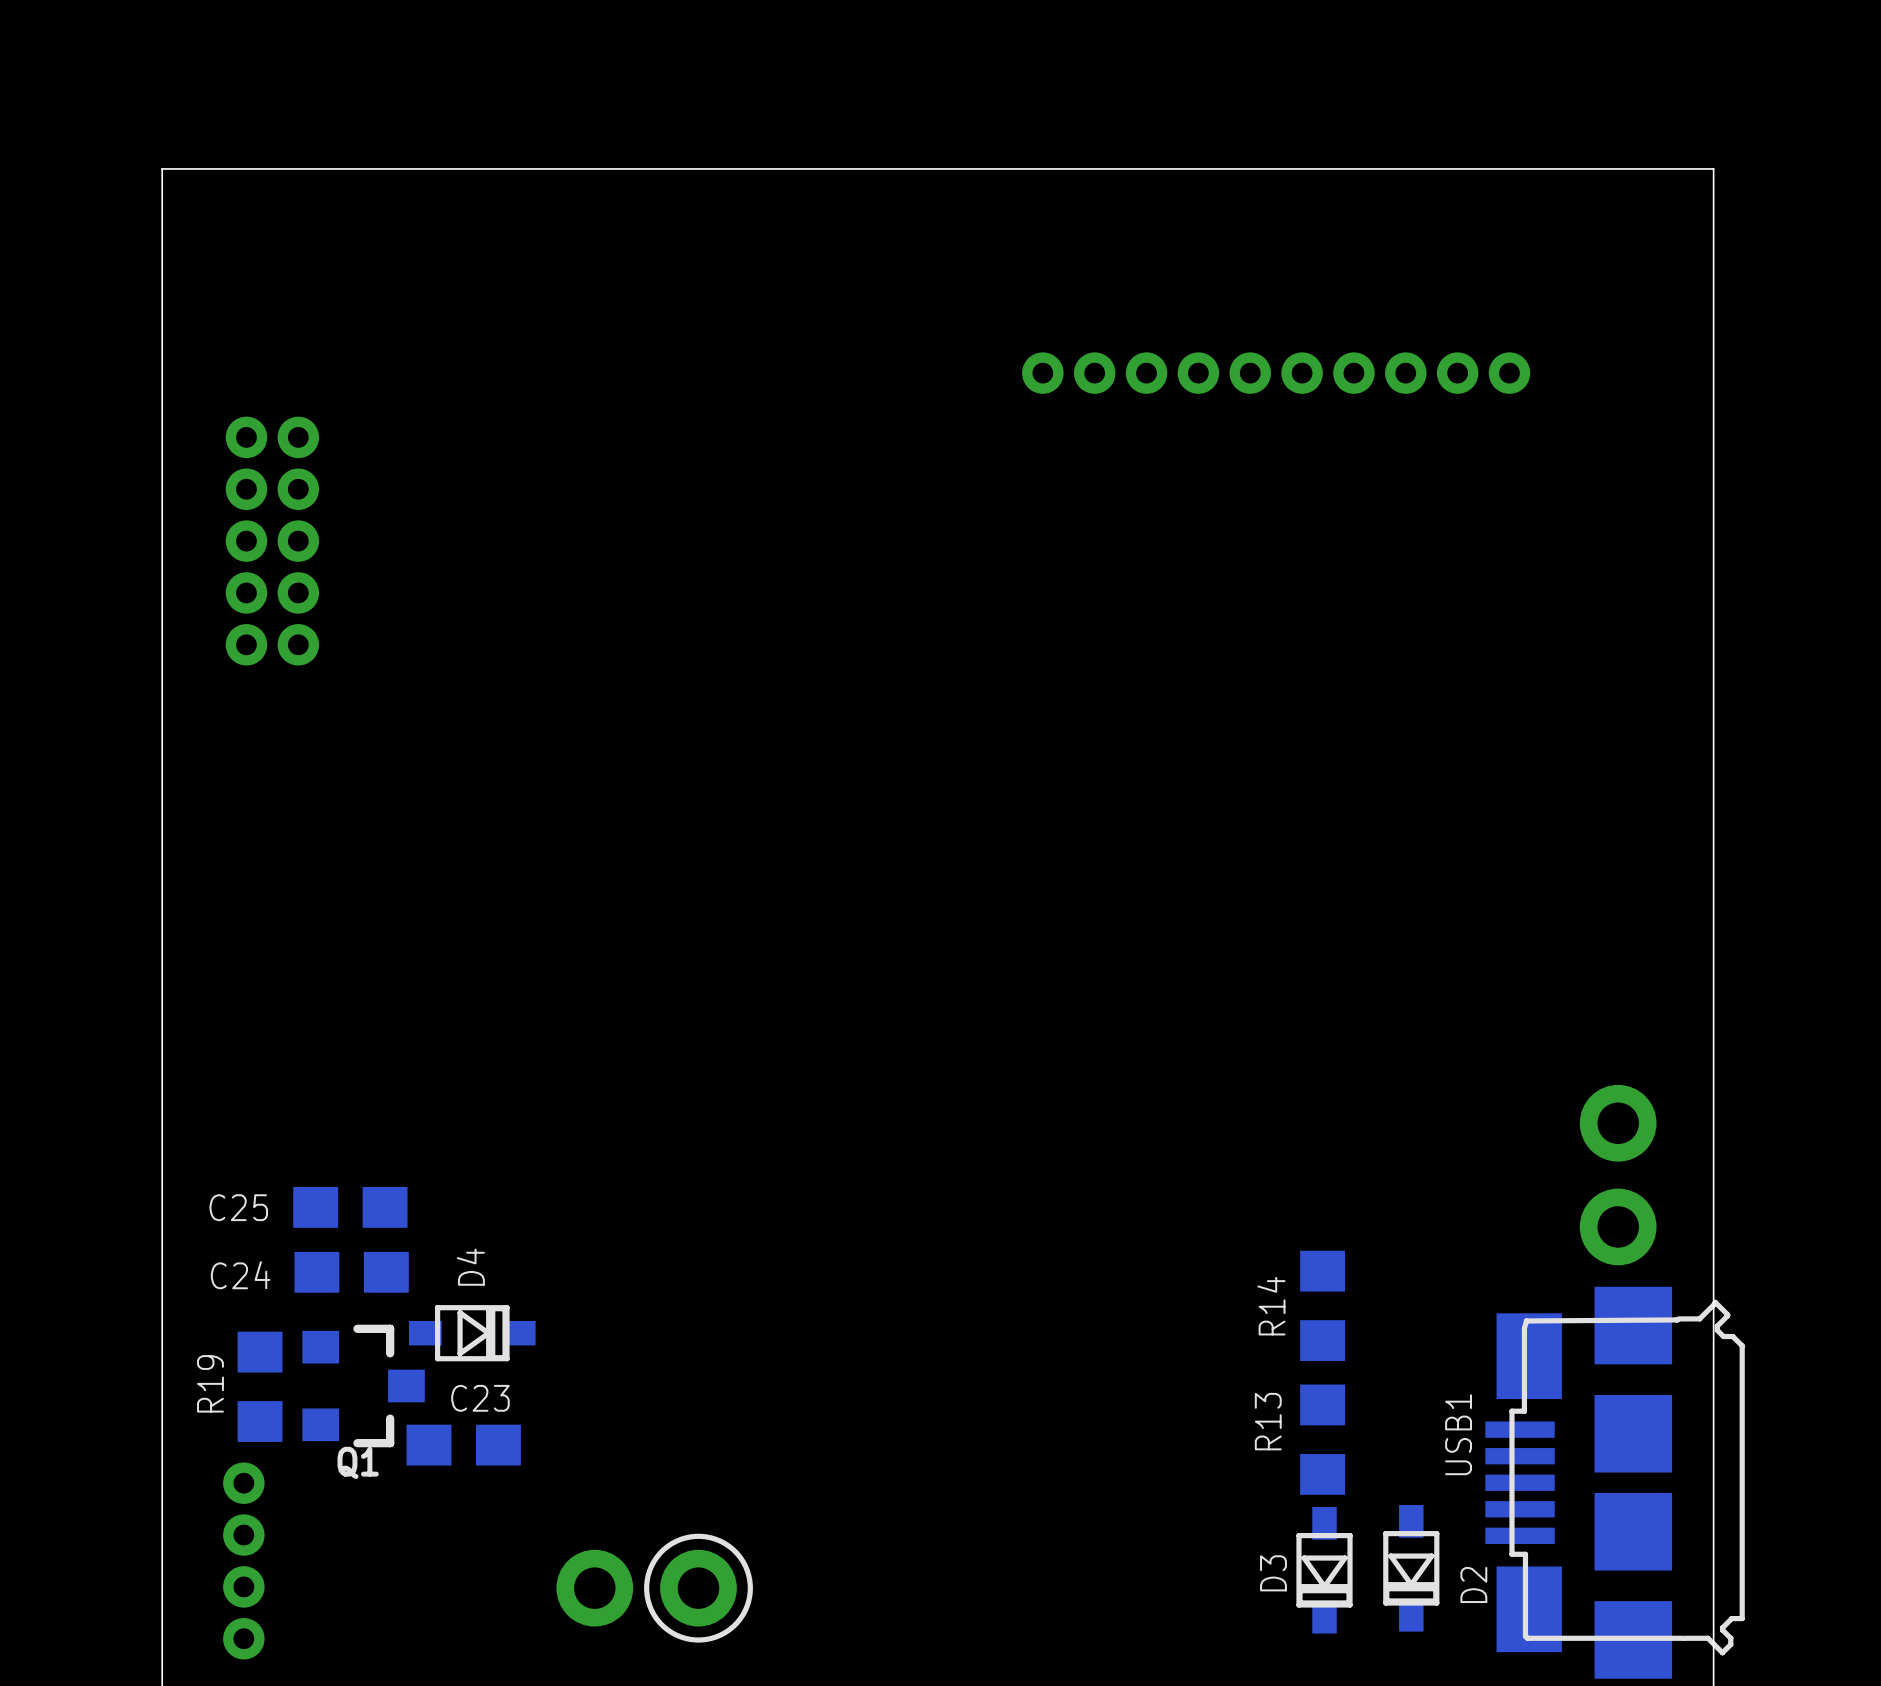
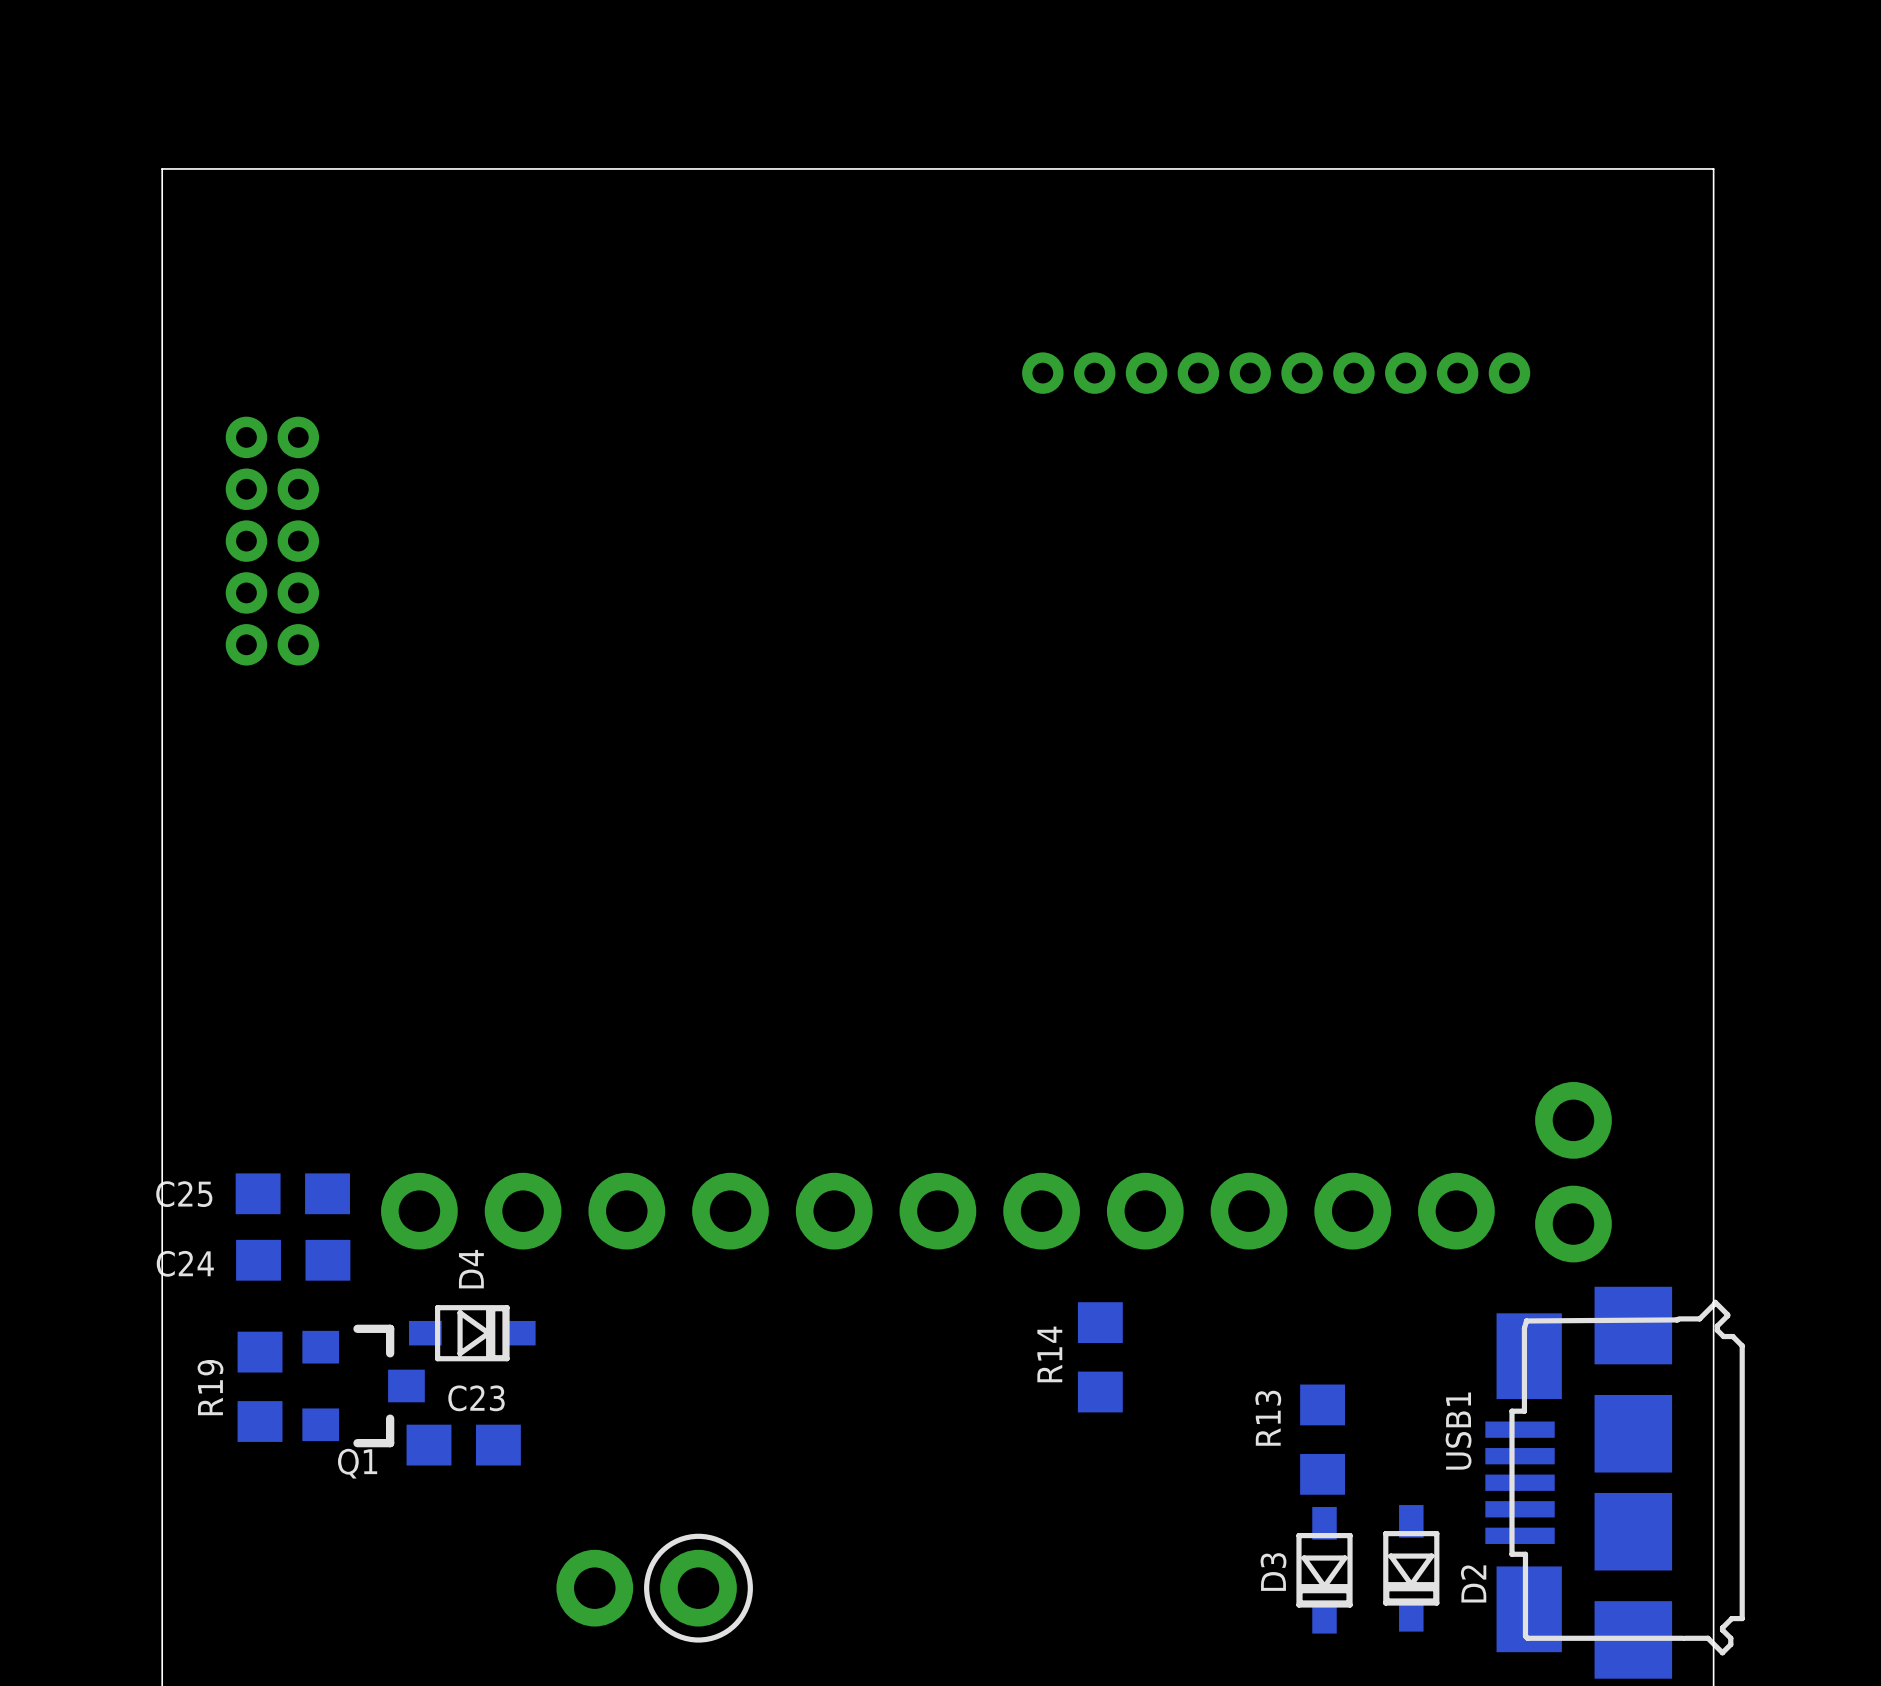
part position: (1618, 1175) -> (1573, 1172)
C25 position: (350, 1207) -> (292, 1193)
part: none -> (419, 1211)
part: none -> (989, 1211)
C24 position: (351, 1272) -> (293, 1260)
R14 position: (1322, 1305) -> (1100, 1357)
part: (243, 1560) -> none

